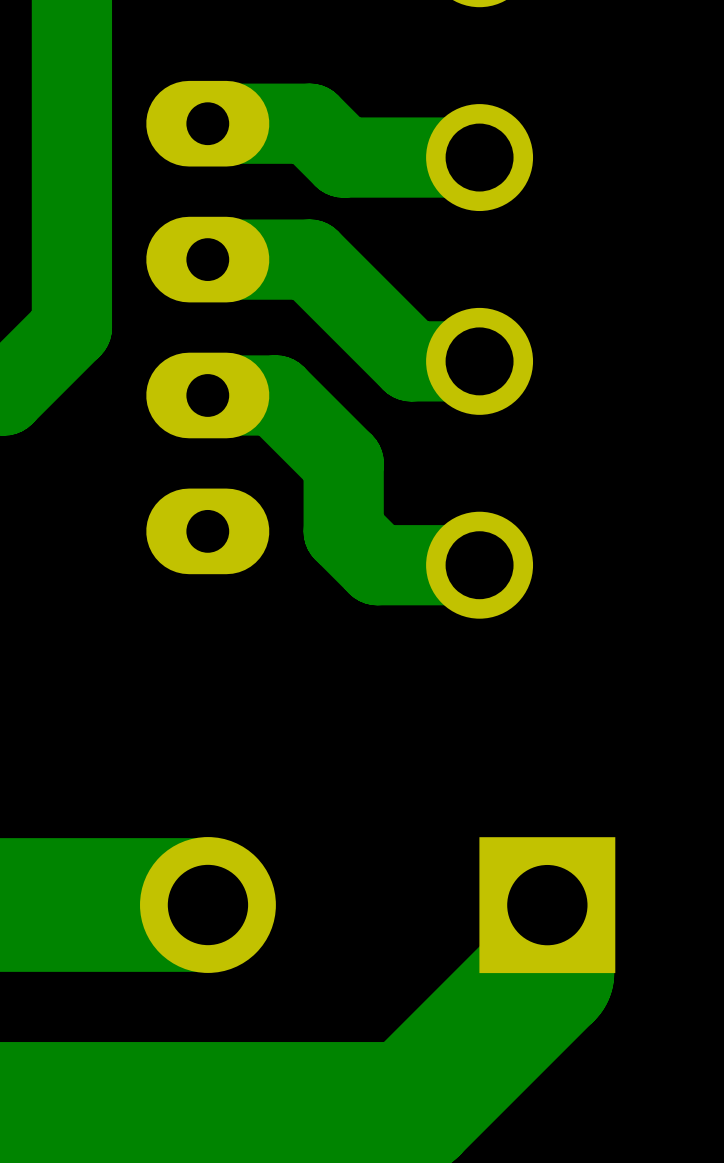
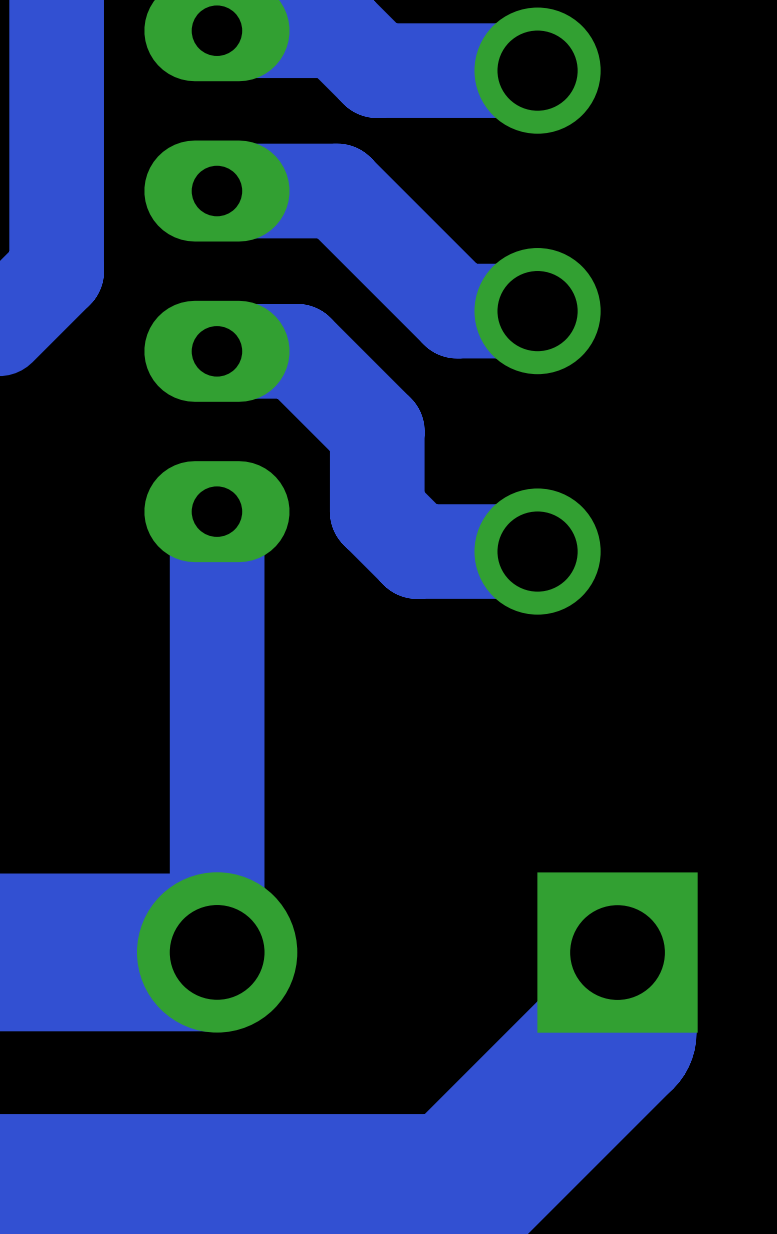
track: none -> (217, 511) (217, 952)

